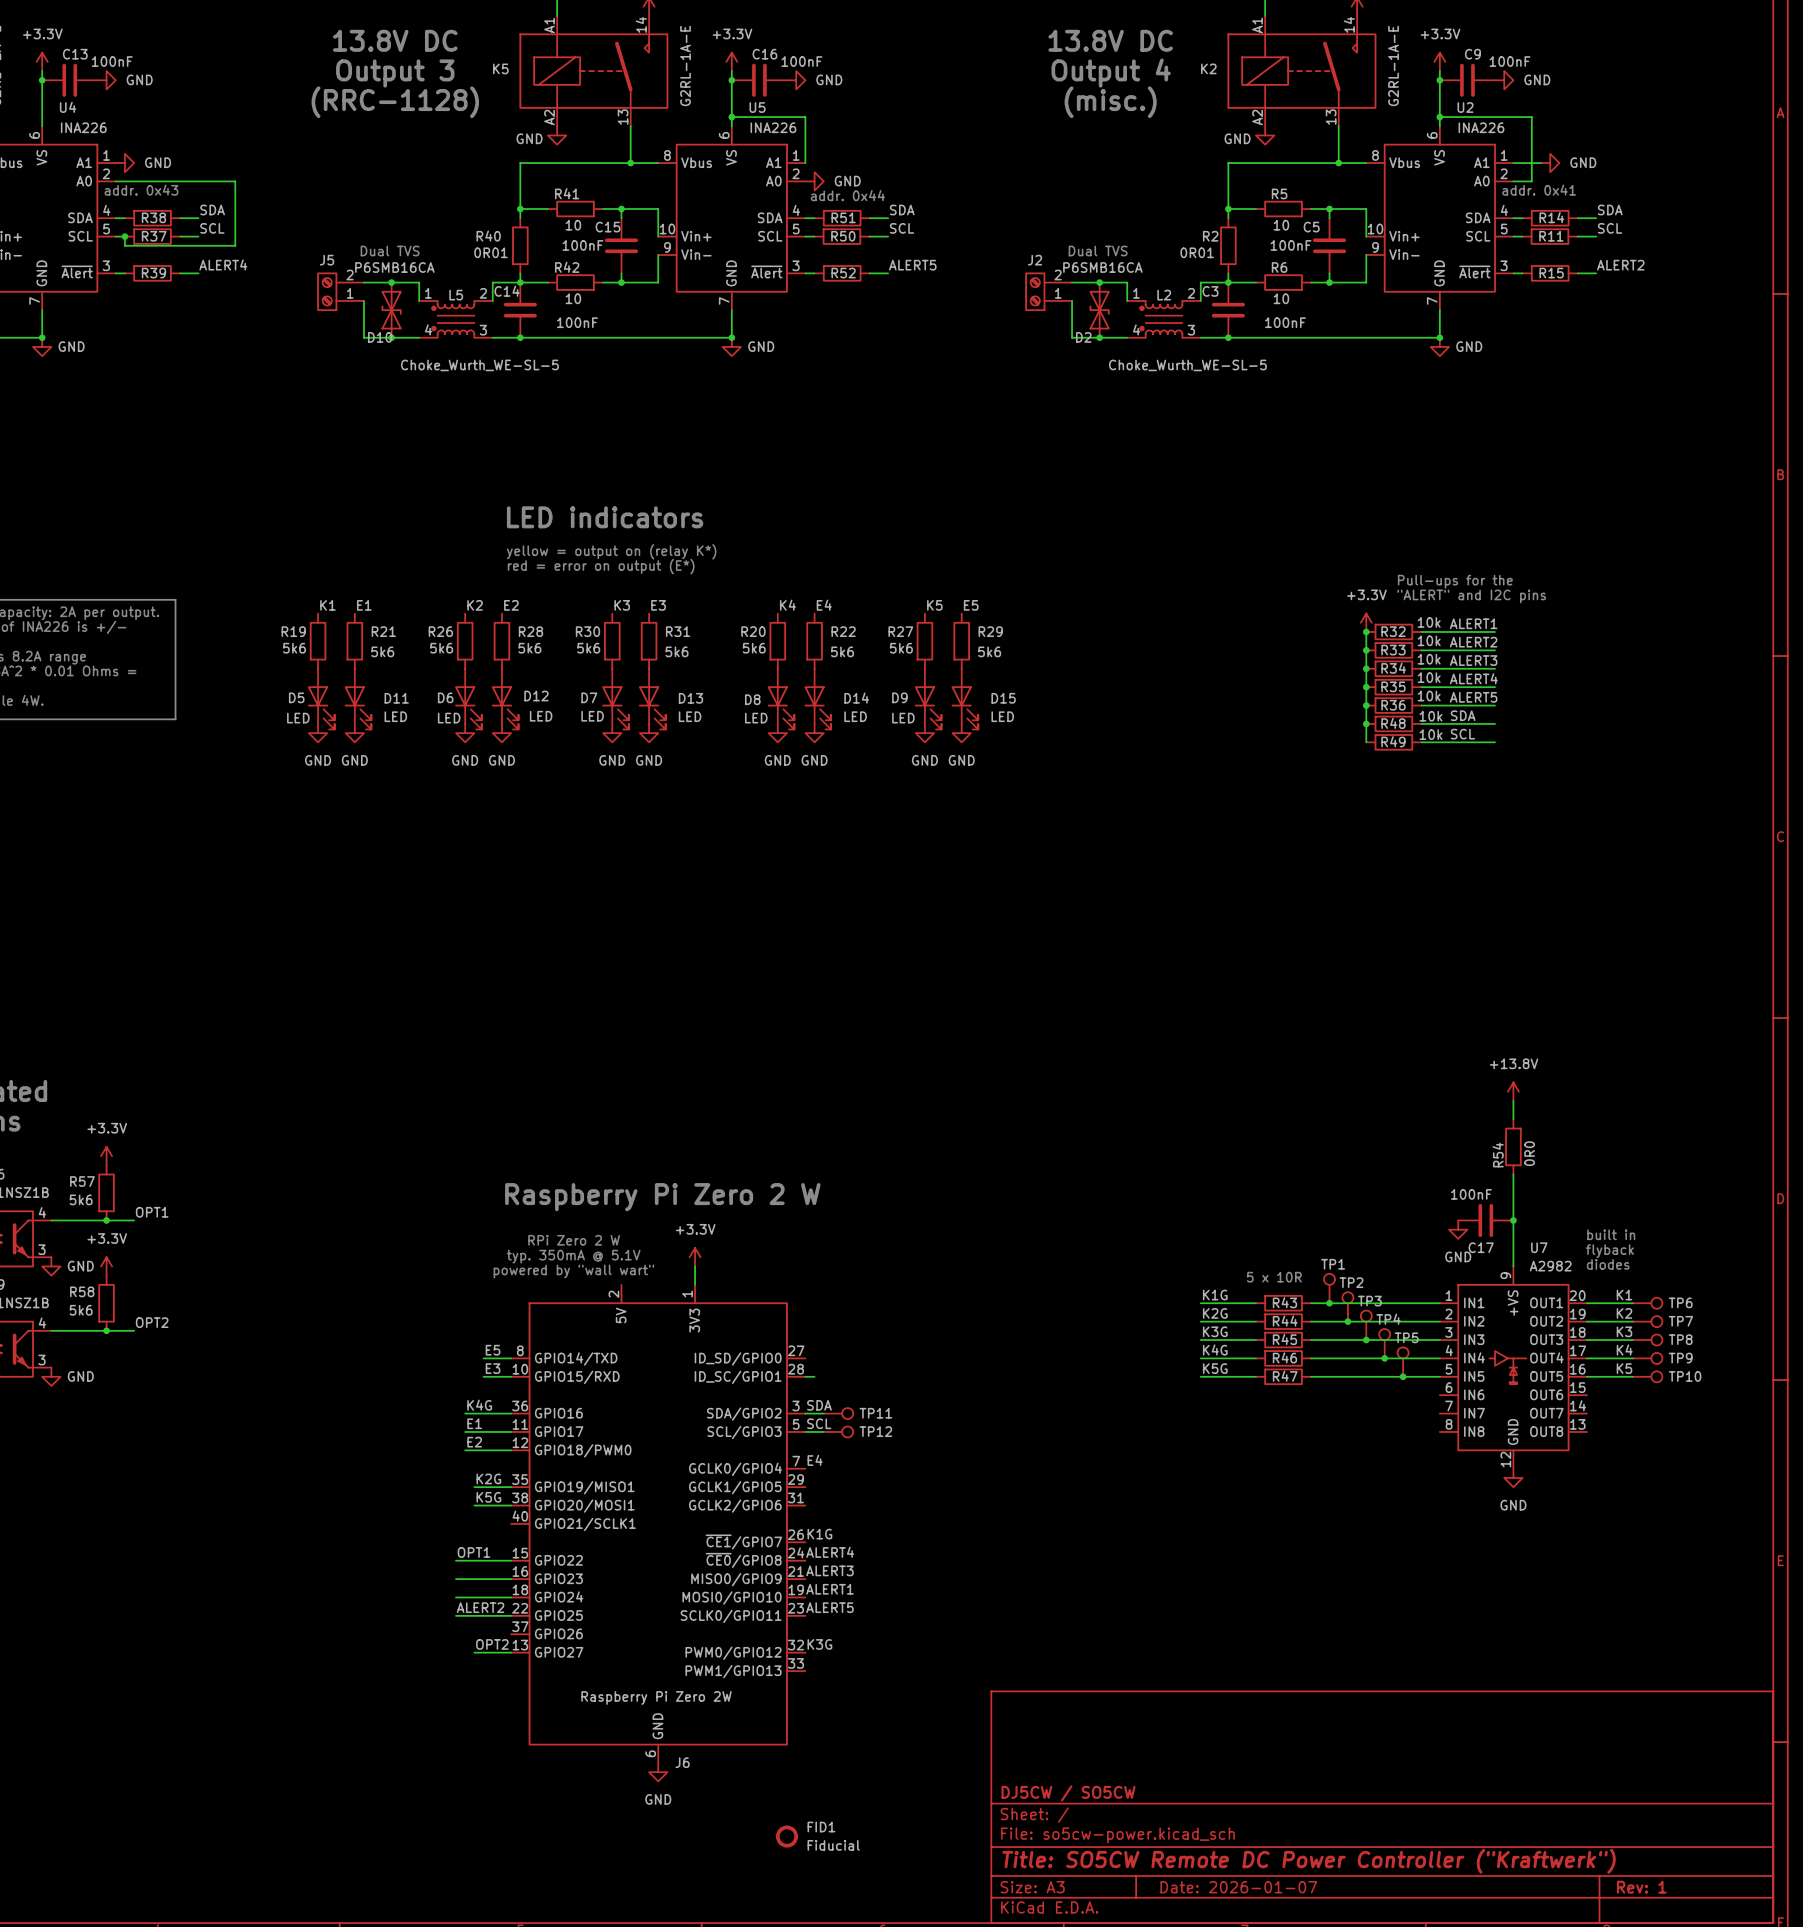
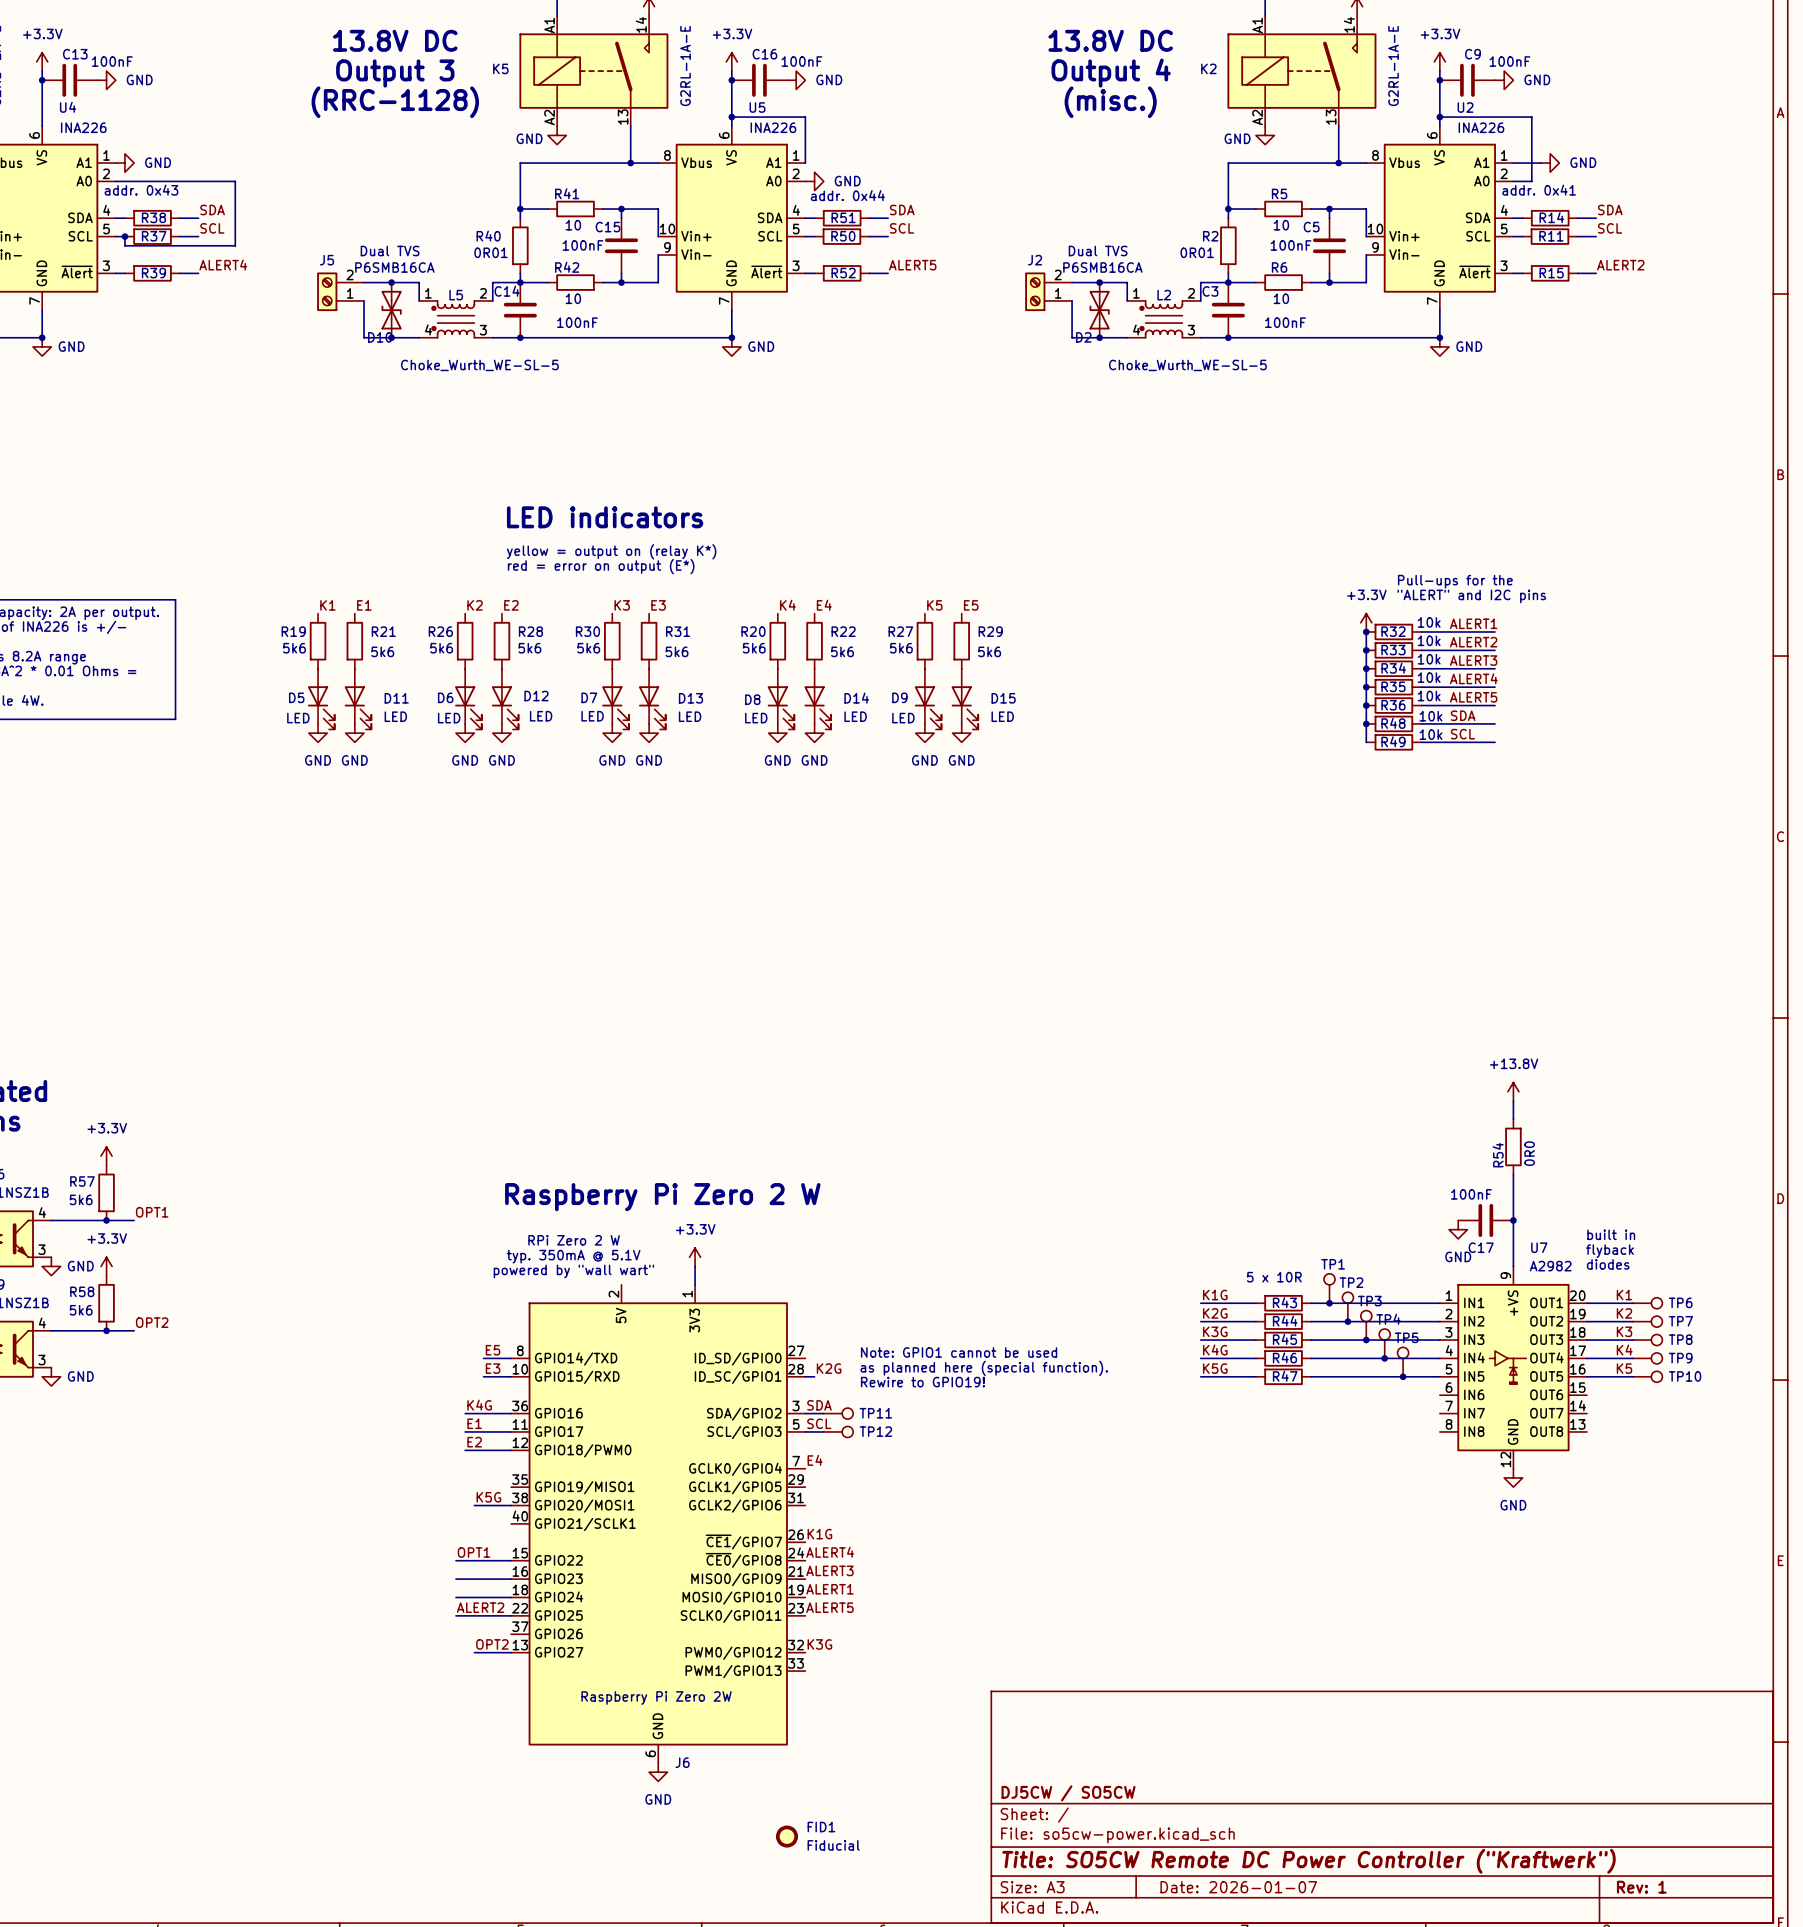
text: none -> Note: GPIO1 cannot be used (959, 1352)
label: none -> K2G (829, 1368)
text: none -> as planned here (special function). (984, 1368)
text: none -> Rewire to GPIO19! (922, 1382)
label: K2G (488, 1478) -> none
wire: (474, 1487) (511, 1487) -> none

